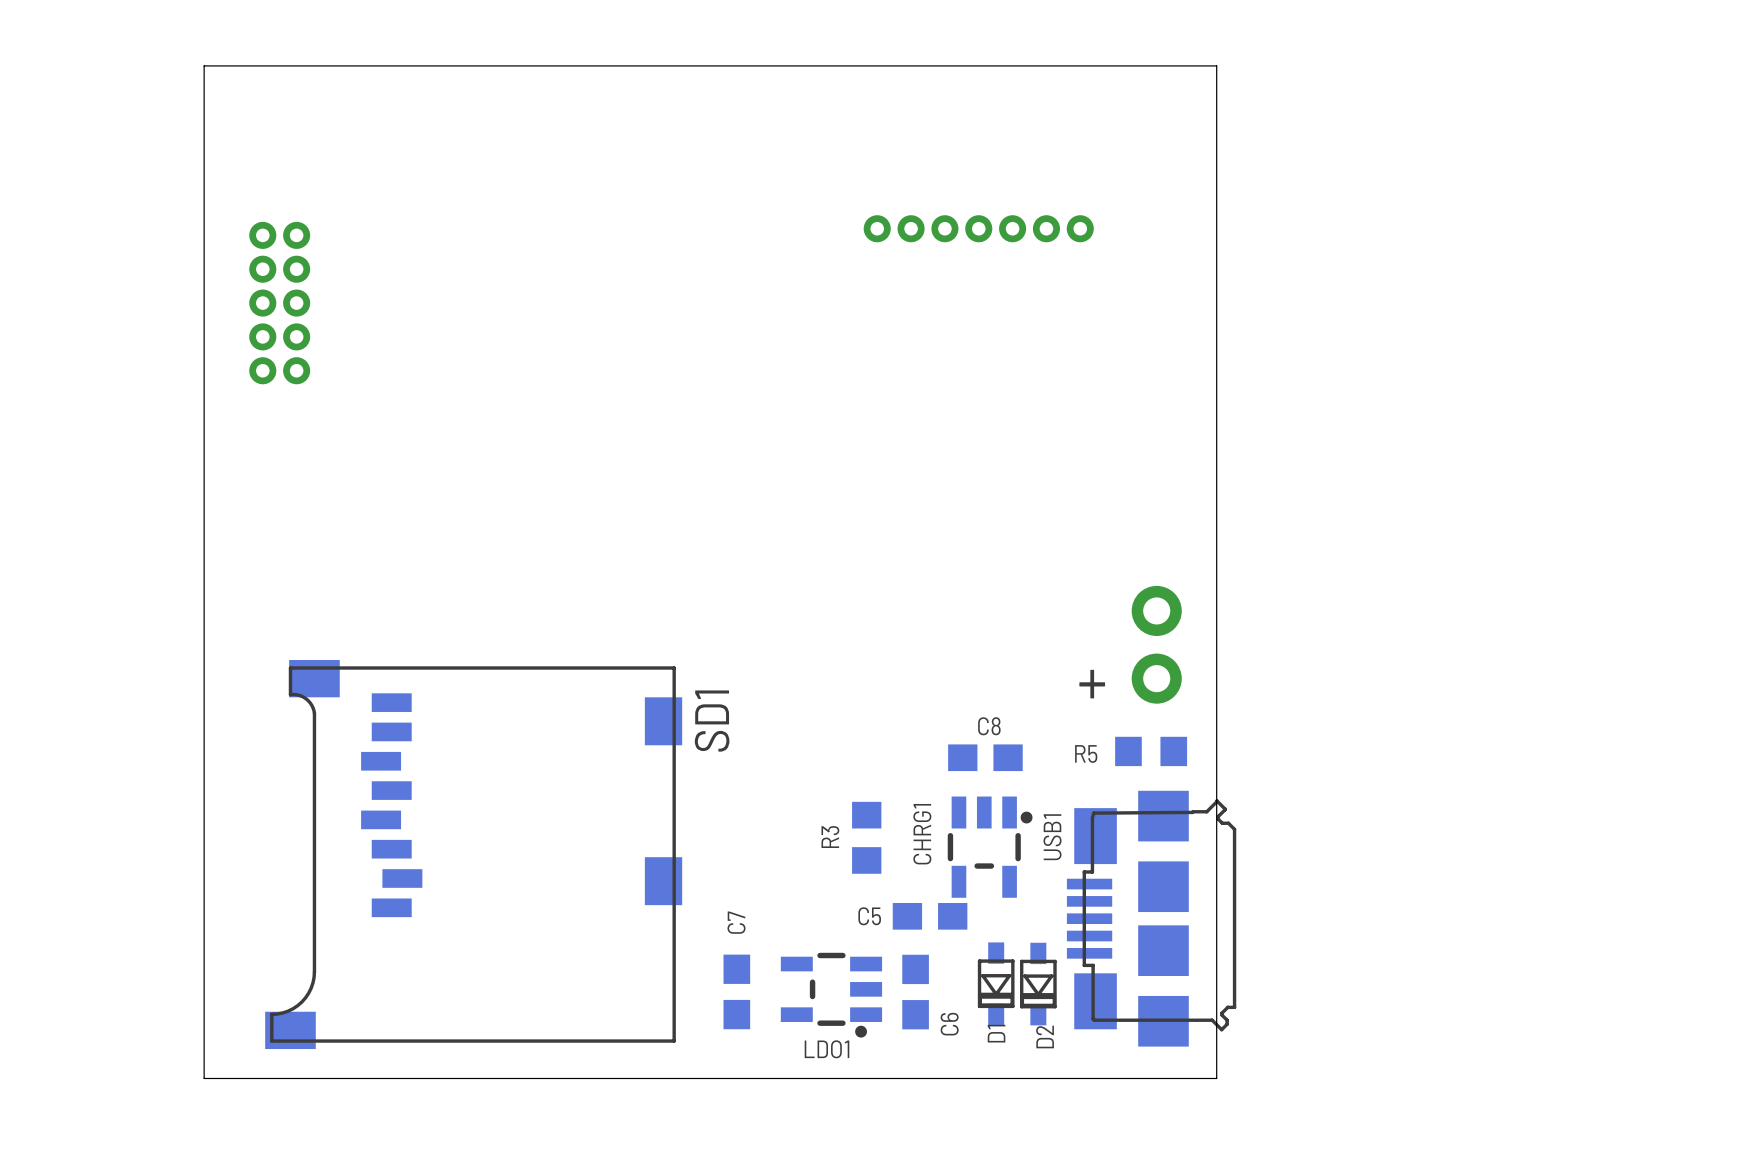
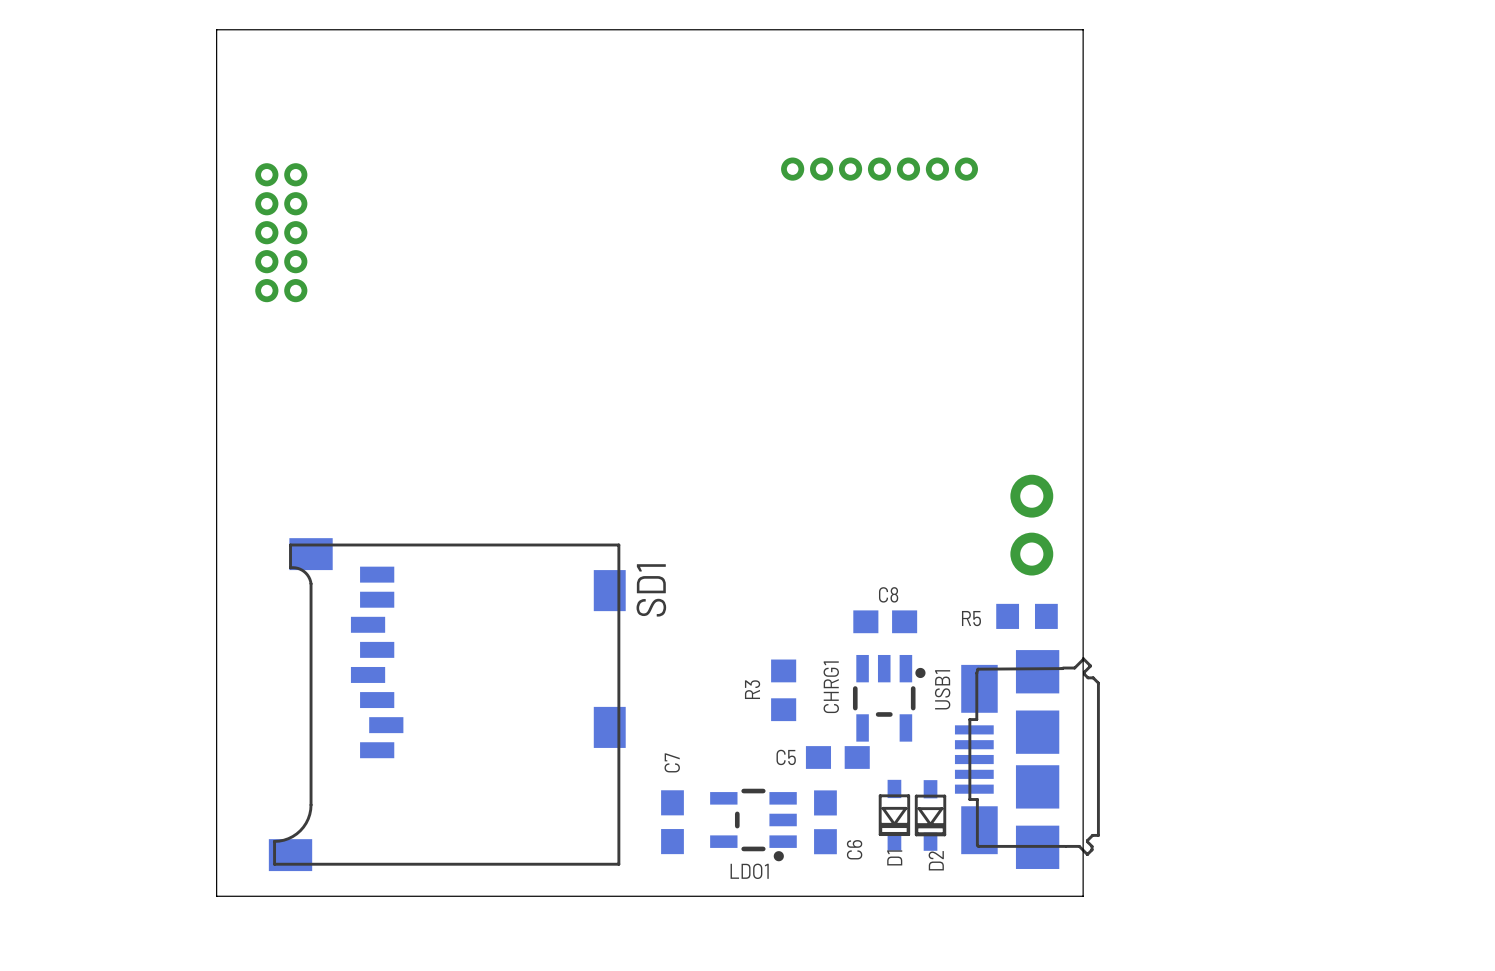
text: + (1092, 684) -> none

